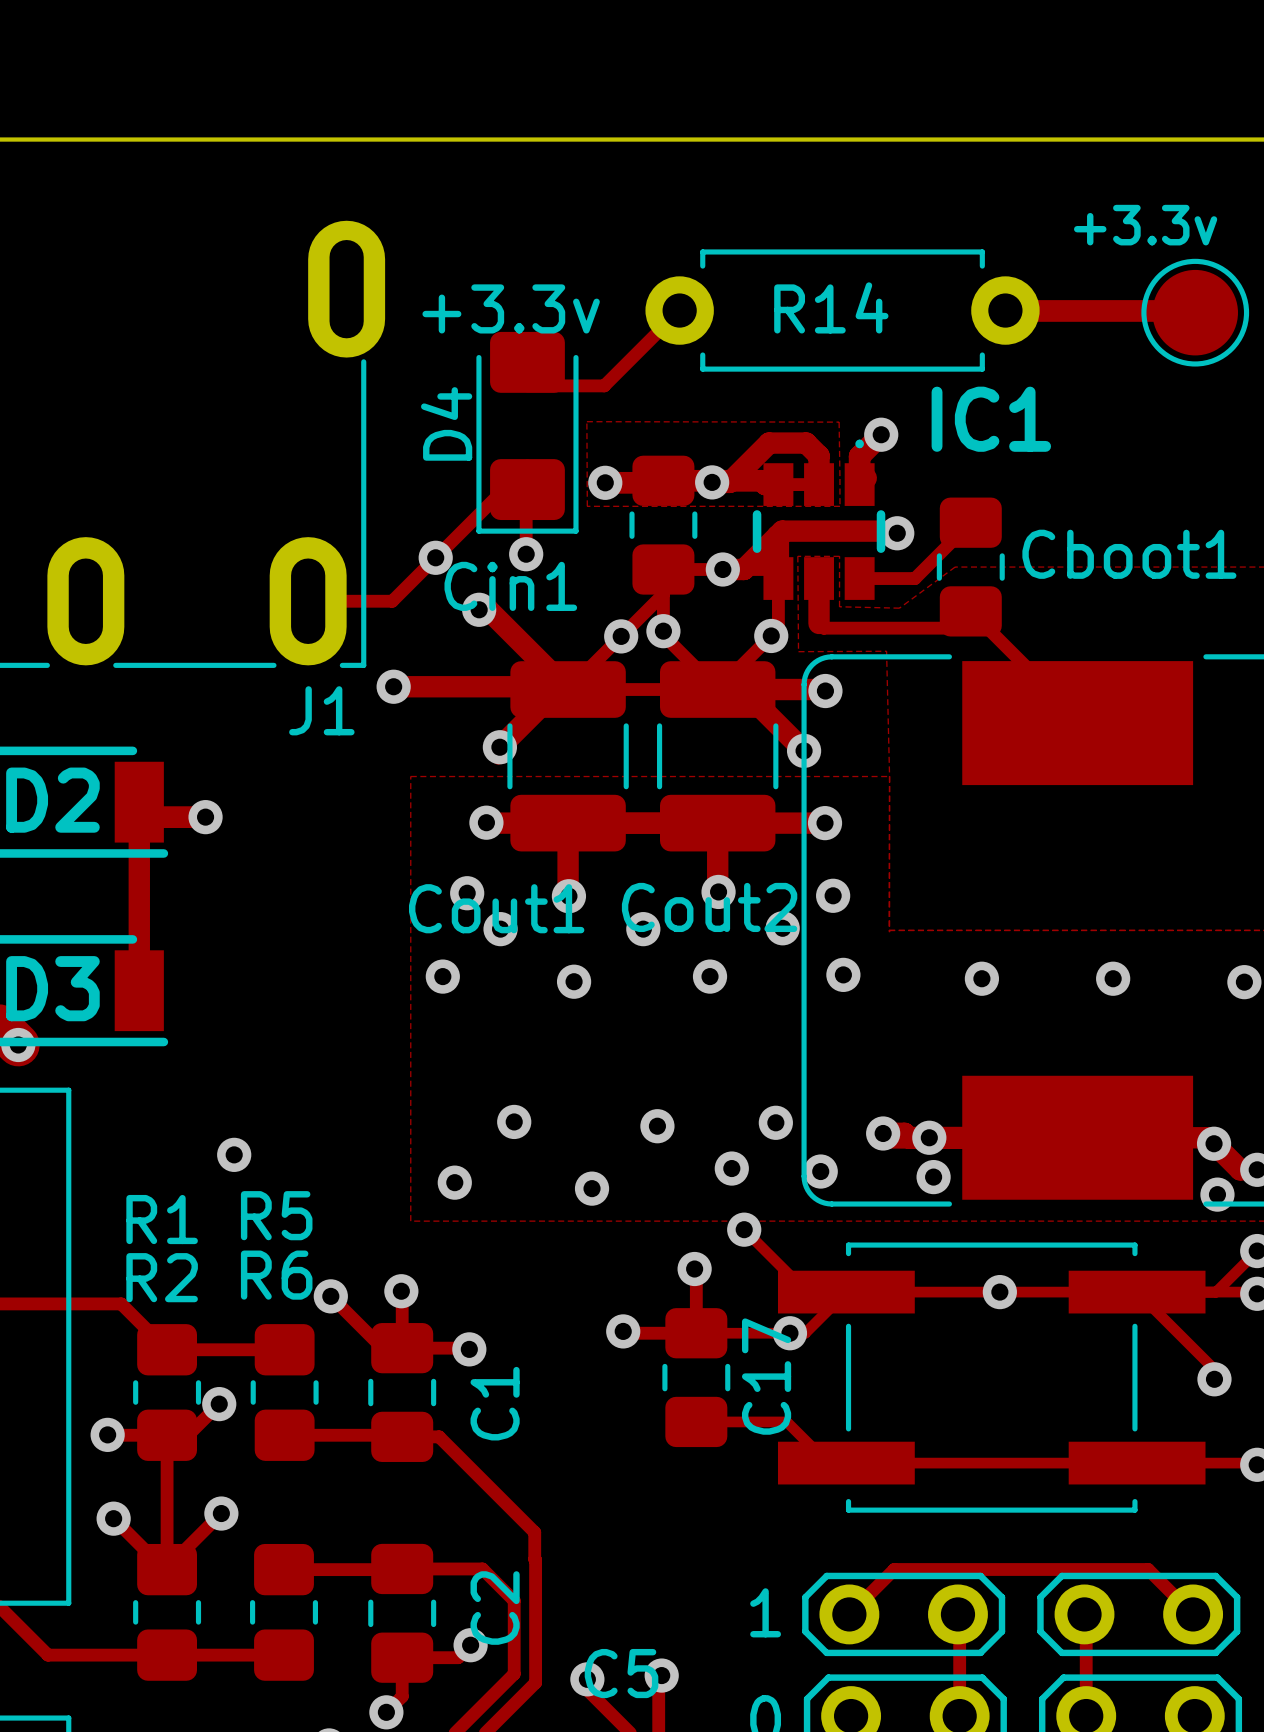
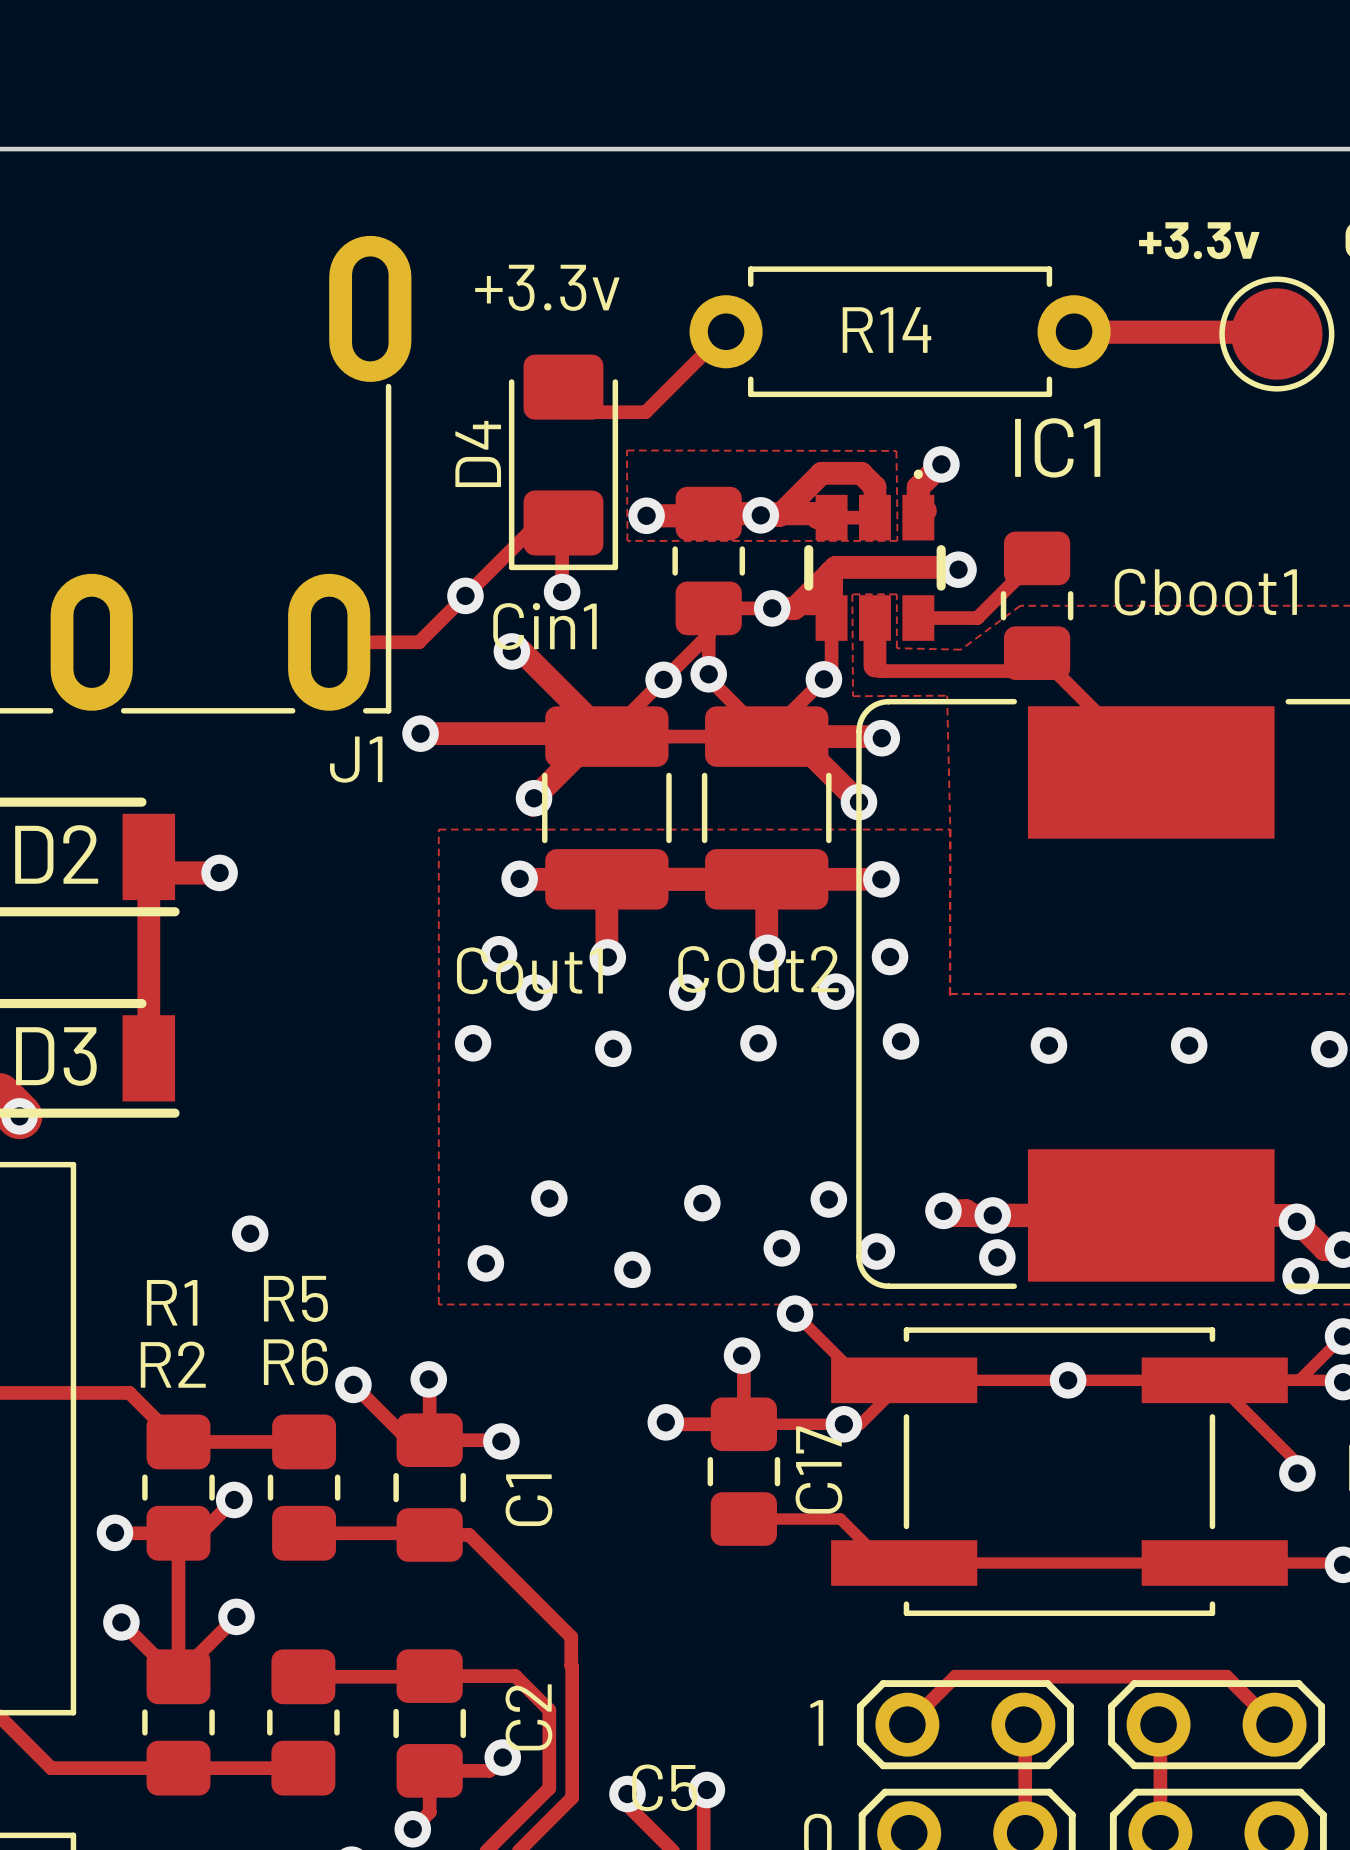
text position: +3.3v (511, 308) -> +3.3v (547, 287)

